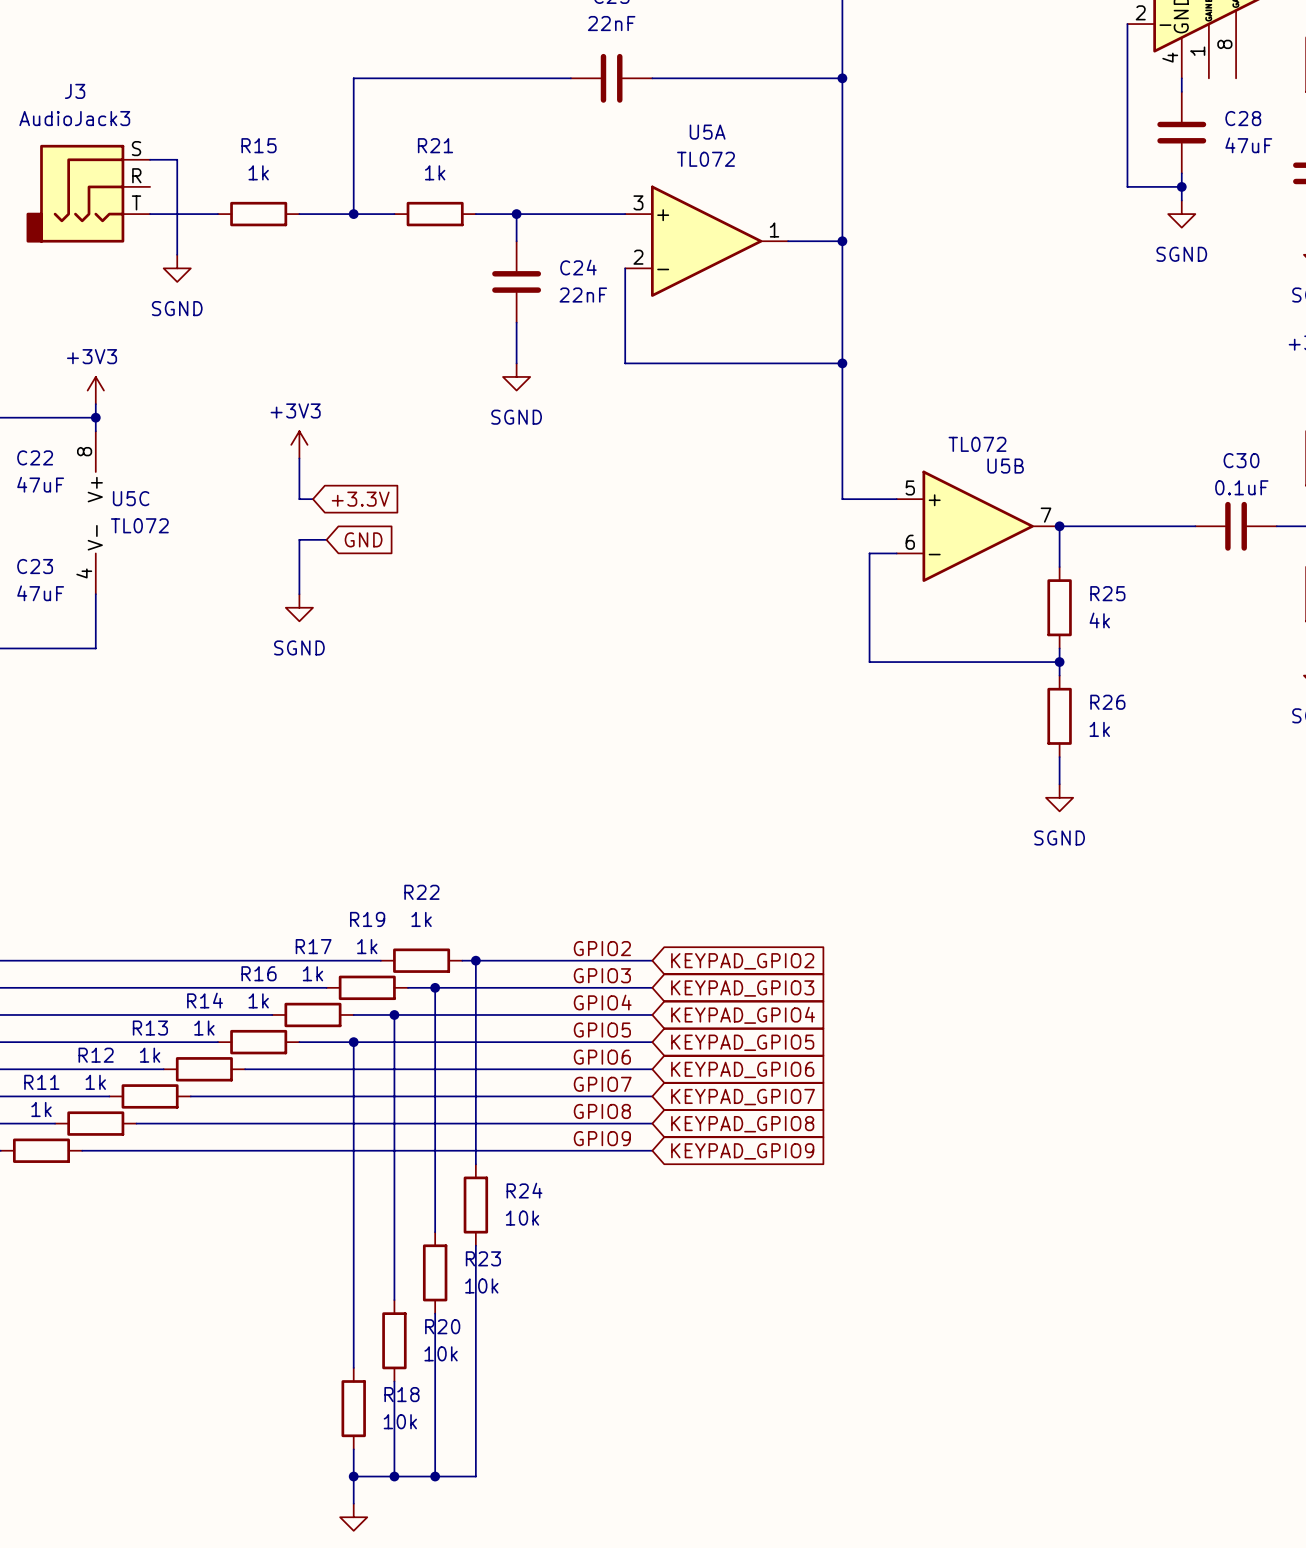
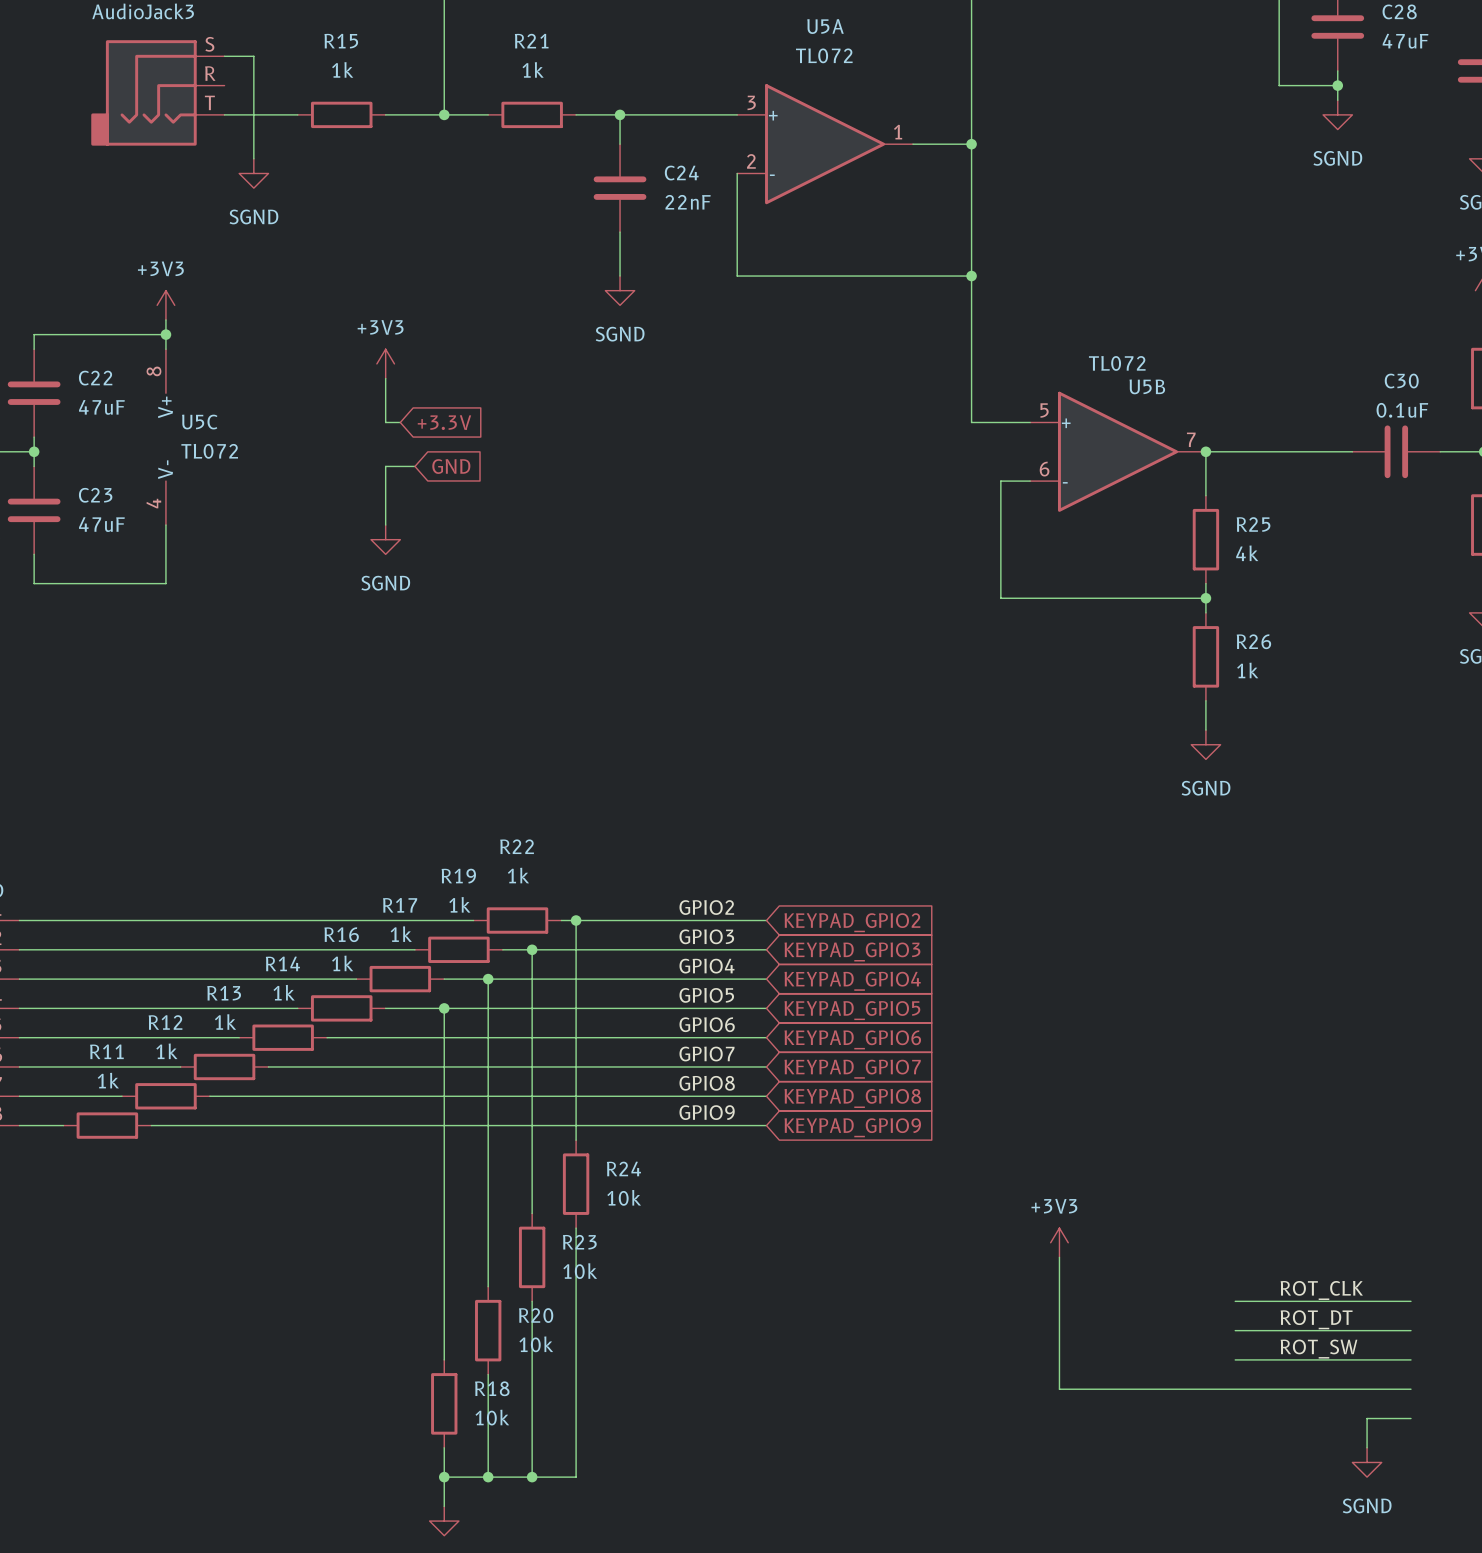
power symbol: none -> +3V3 (1059, 1242)
wire: none -> (1059, 1257) (1059, 1389) (1410, 1389)
label: none -> ROT_CLK (1321, 1290)
wire: none -> (1235, 1301) (1410, 1301)
label: none -> ROT_DT (1316, 1319)
wire: none -> (1235, 1330) (1410, 1330)
label: none -> ROT_SW (1319, 1349)
wire: none -> (1235, 1359) (1410, 1359)
wire: none -> (1410, 1418) (1367, 1418) (1367, 1447)
power symbol: none -> SGND (1367, 1462)

